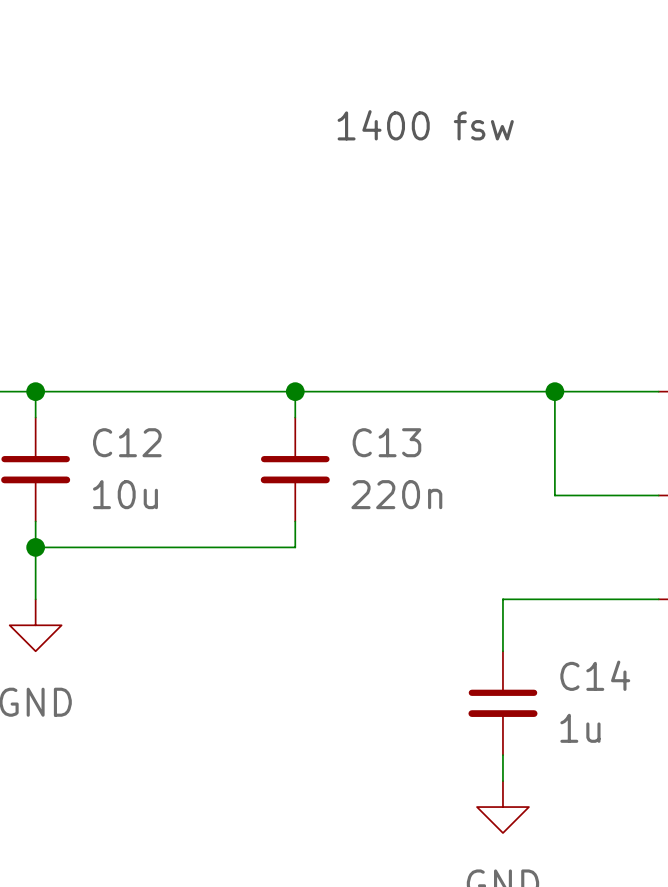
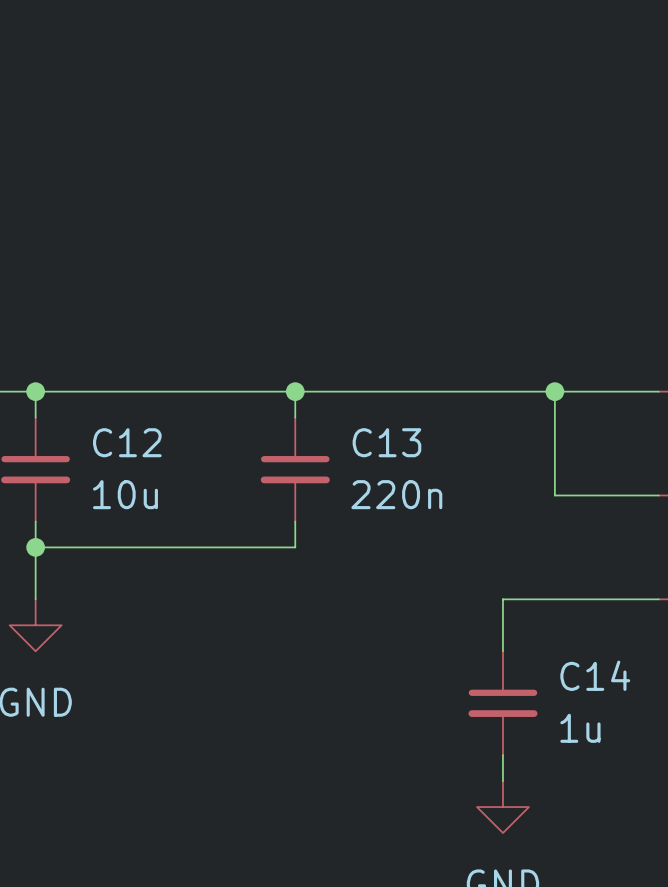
text: 1400 fsw (425, 125) -> none

